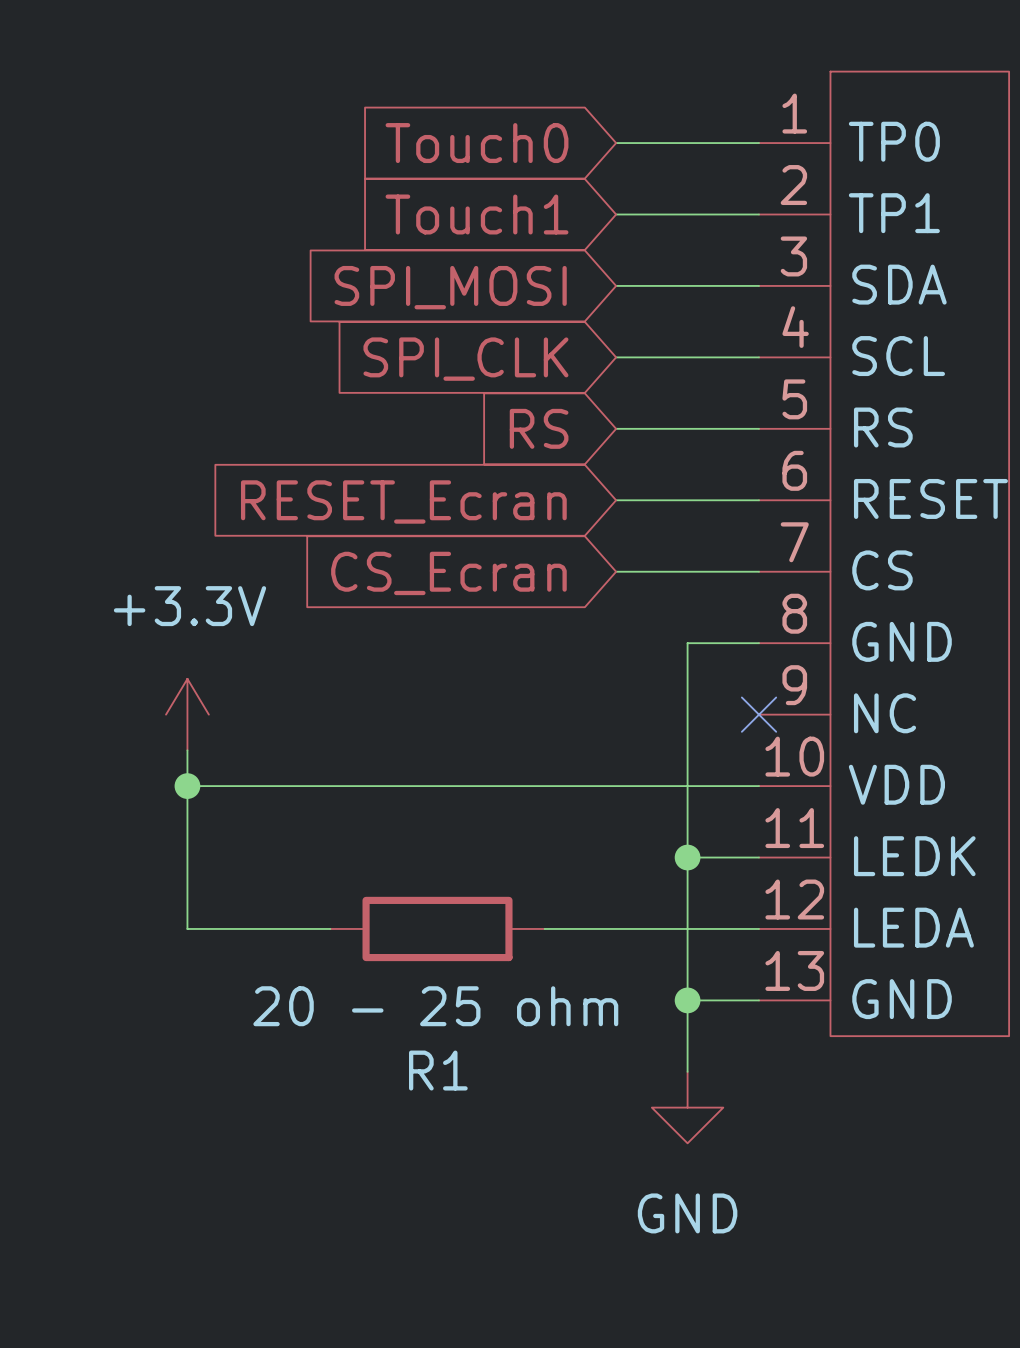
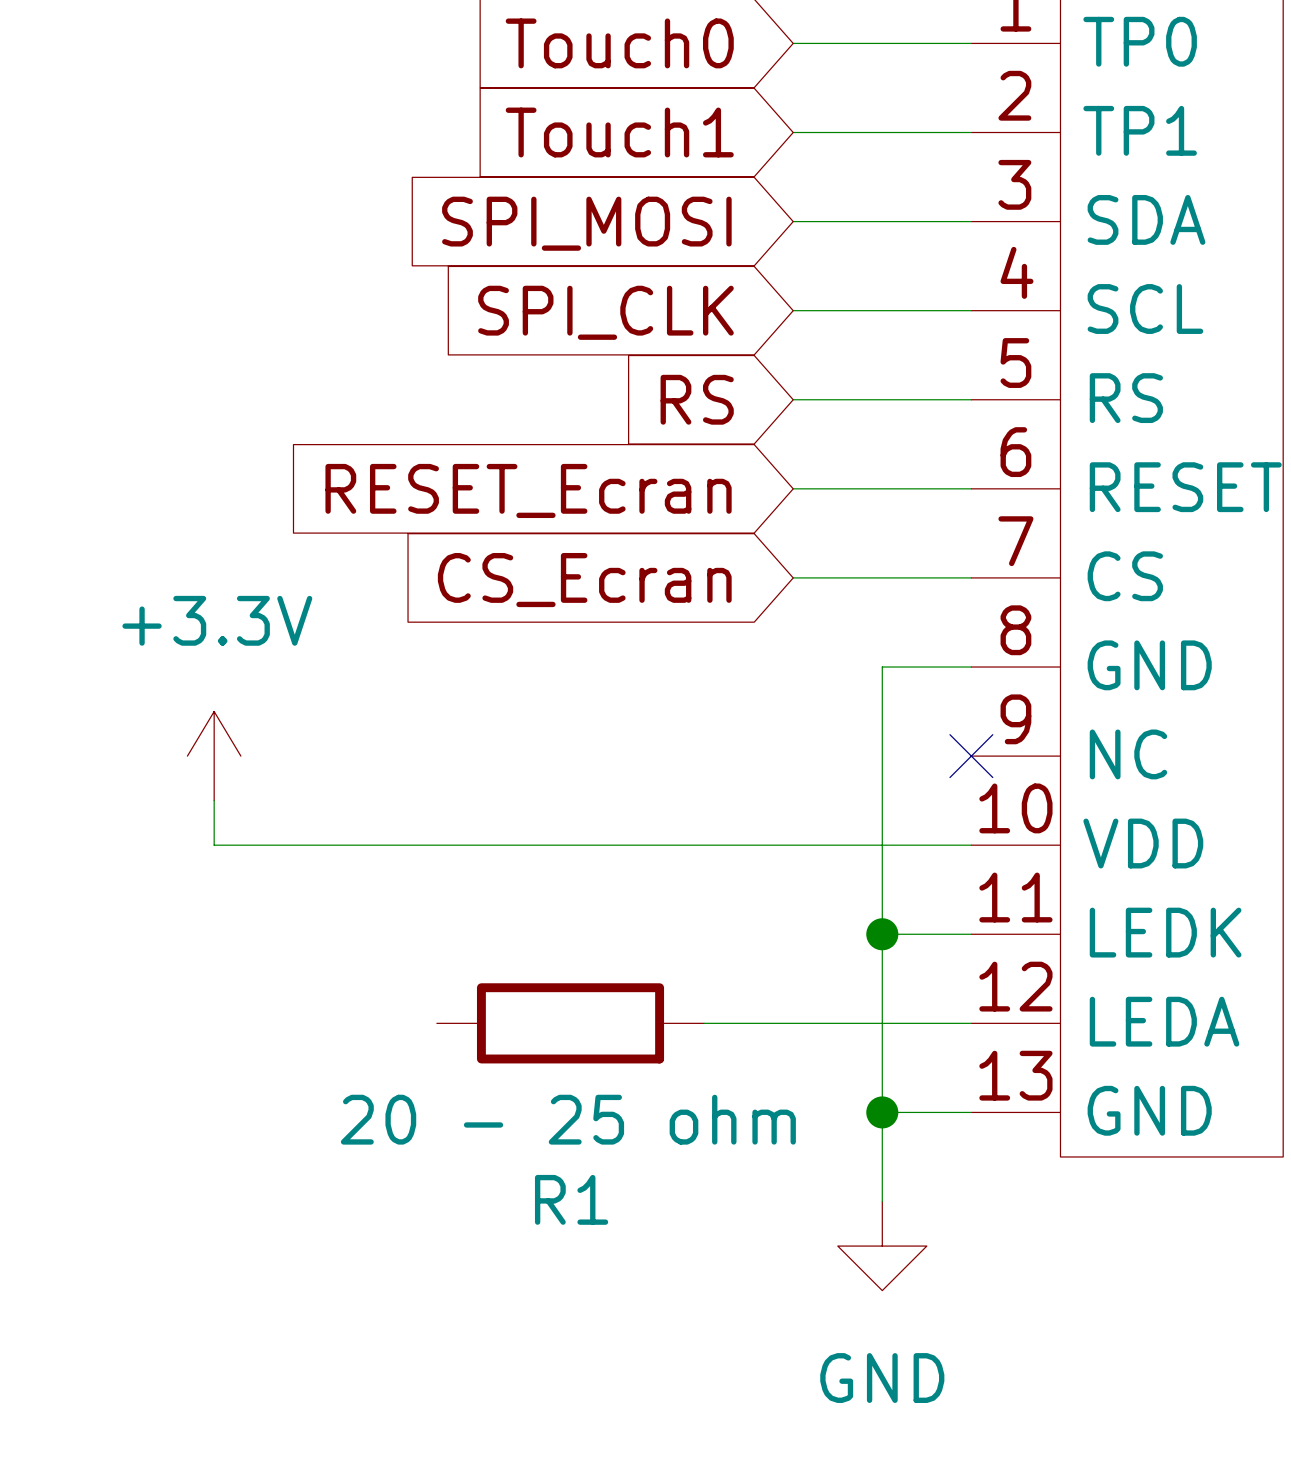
power symbol position: +3.3V (187, 714) -> +3.3V (214, 756)
wire: none -> (214, 800) (214, 845) (258, 845)
wire: (187, 750) (187, 928) (330, 928) -> none
junction: (187, 786) -> none

